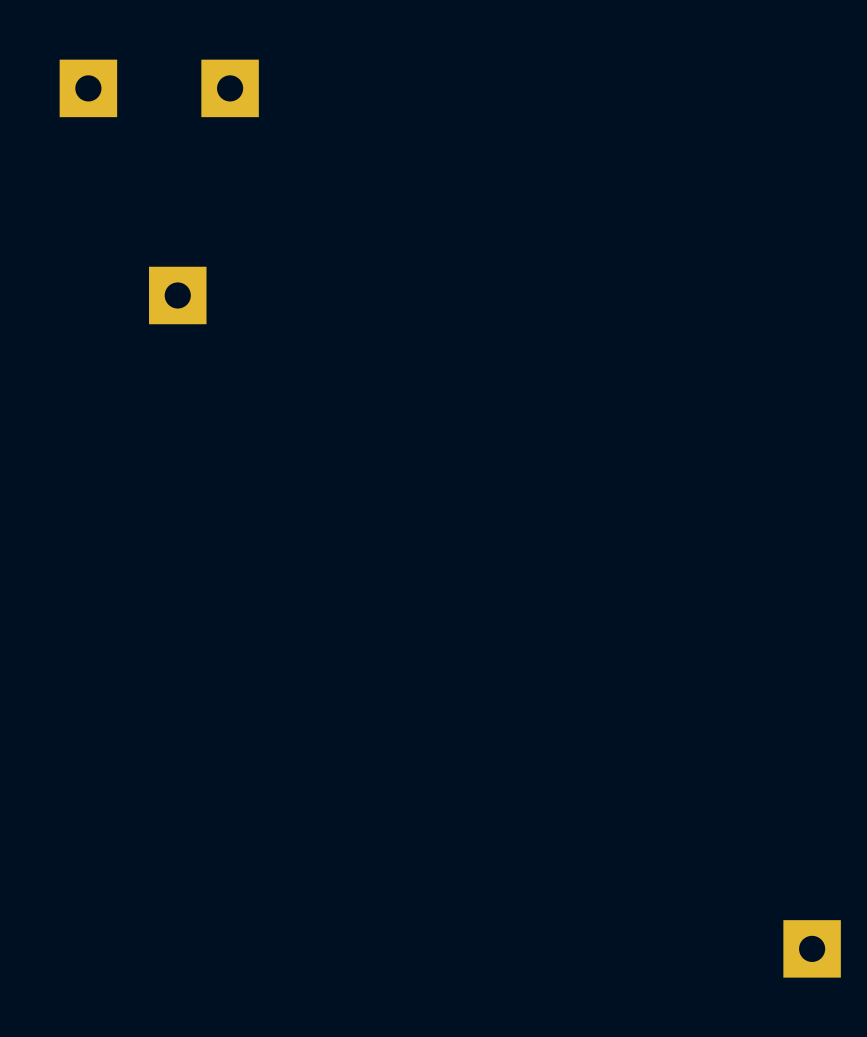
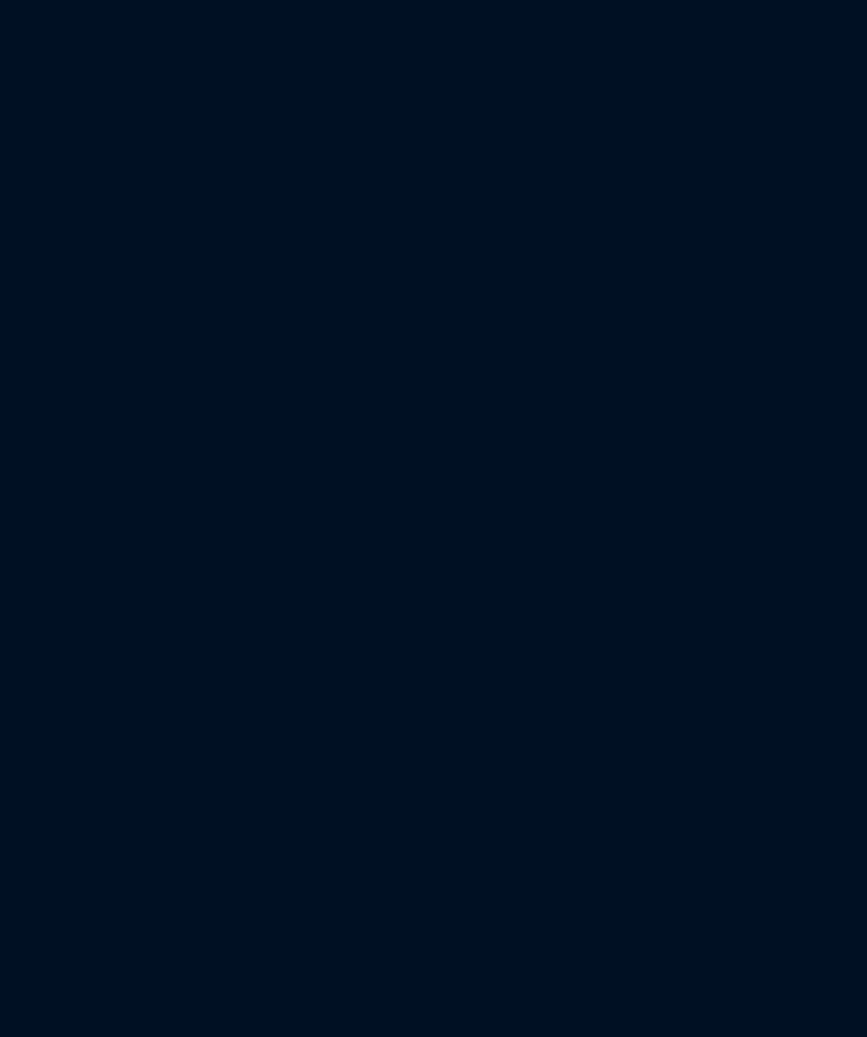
part: (88, 88) -> none
part: (230, 88) -> none
part: (177, 295) -> none
part: (812, 948) -> none

